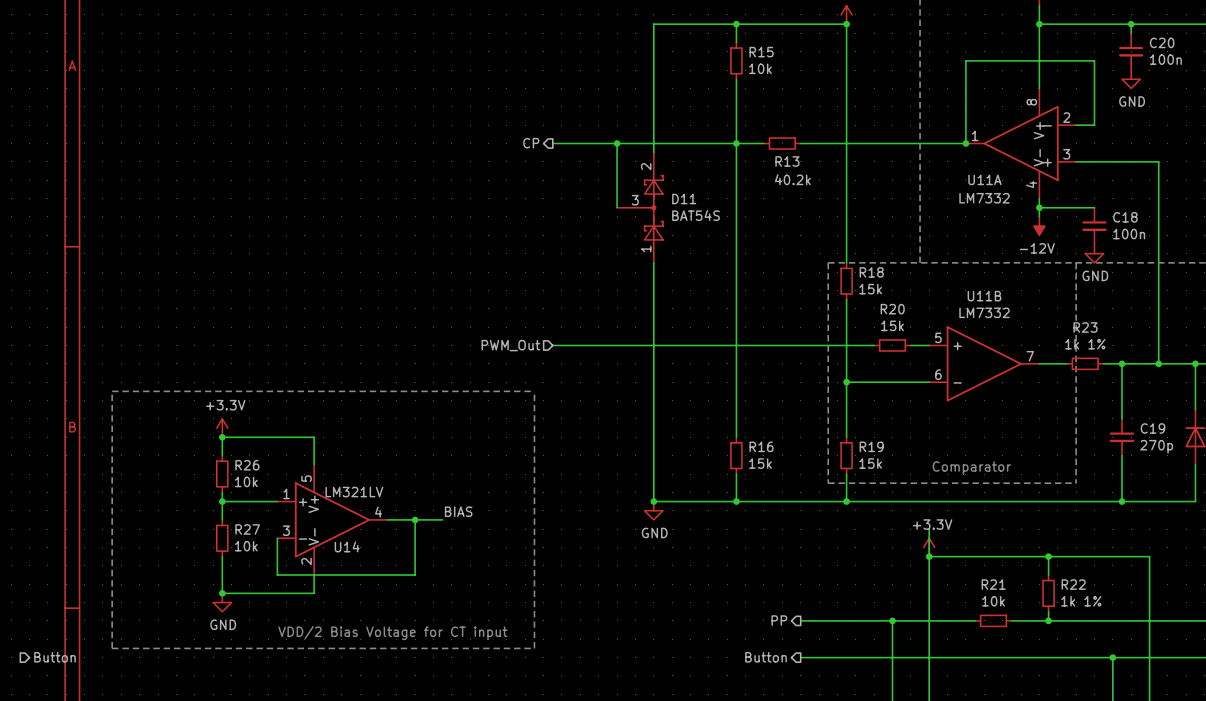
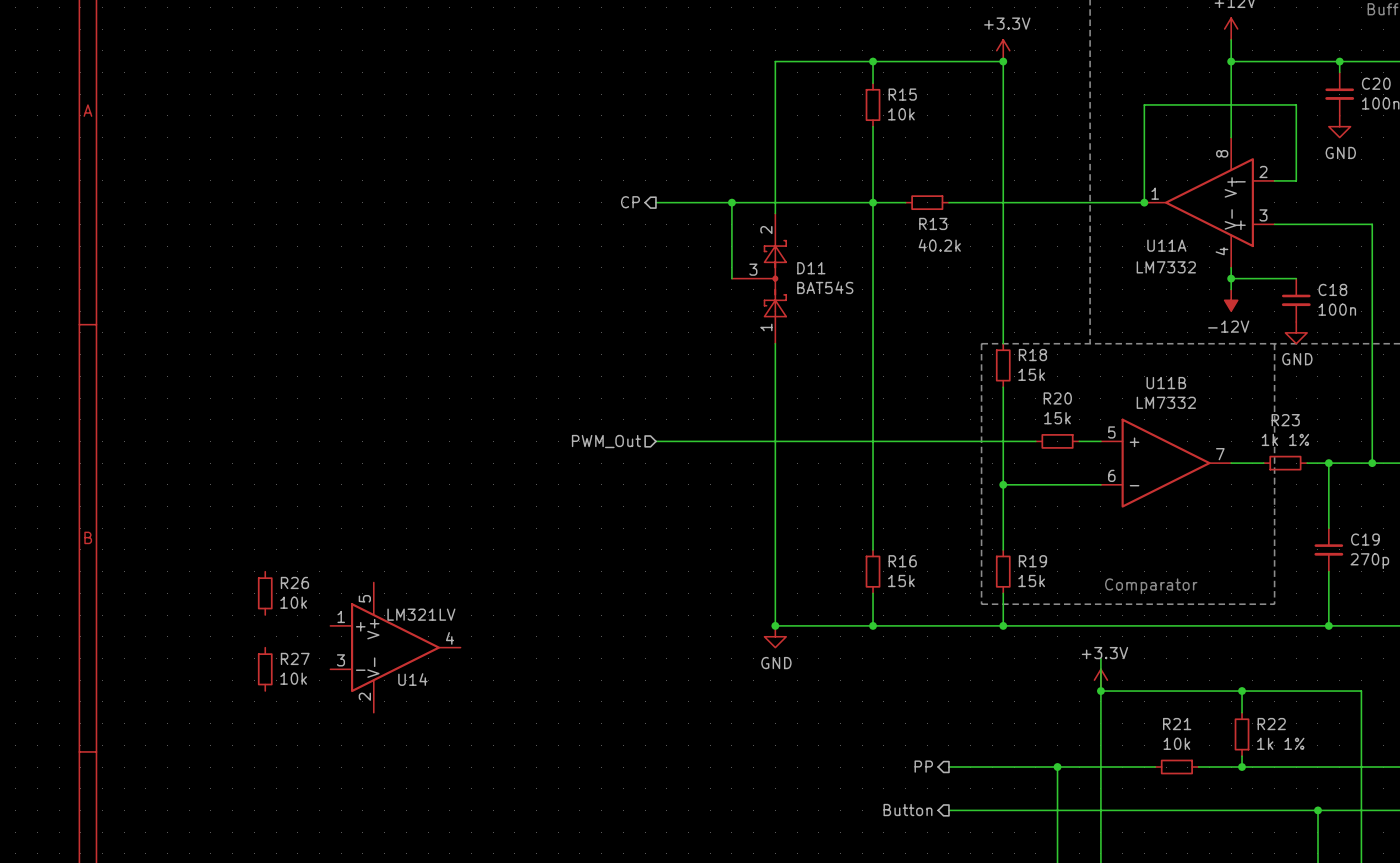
line: (112, 391) (112, 648) (534, 648) (534, 391) (112, 391) -> none
power symbol: +3.3V (222, 428) -> none
junction: (222, 437) -> none
wire: (222, 455) (222, 437) (314, 437) (314, 464) -> none
wire: (222, 492) (222, 519) -> none
wire: (222, 501) (277, 501) -> none
junction: (222, 501) -> none
label: BIAS (458, 511) -> none
wire: (387, 519) (442, 519) -> none
wire: (415, 519) (415, 574) (277, 574) (277, 538) -> none
junction: (415, 519) -> none
wire: (222, 556) (222, 593) (314, 593) (314, 574) -> none
junction: (222, 593) -> none
power symbol: GND (222, 602) -> none
text: VDD/2 Bias Voltage for CT input (392, 633) -> none
hierarchical label: Button (55, 657) -> none

